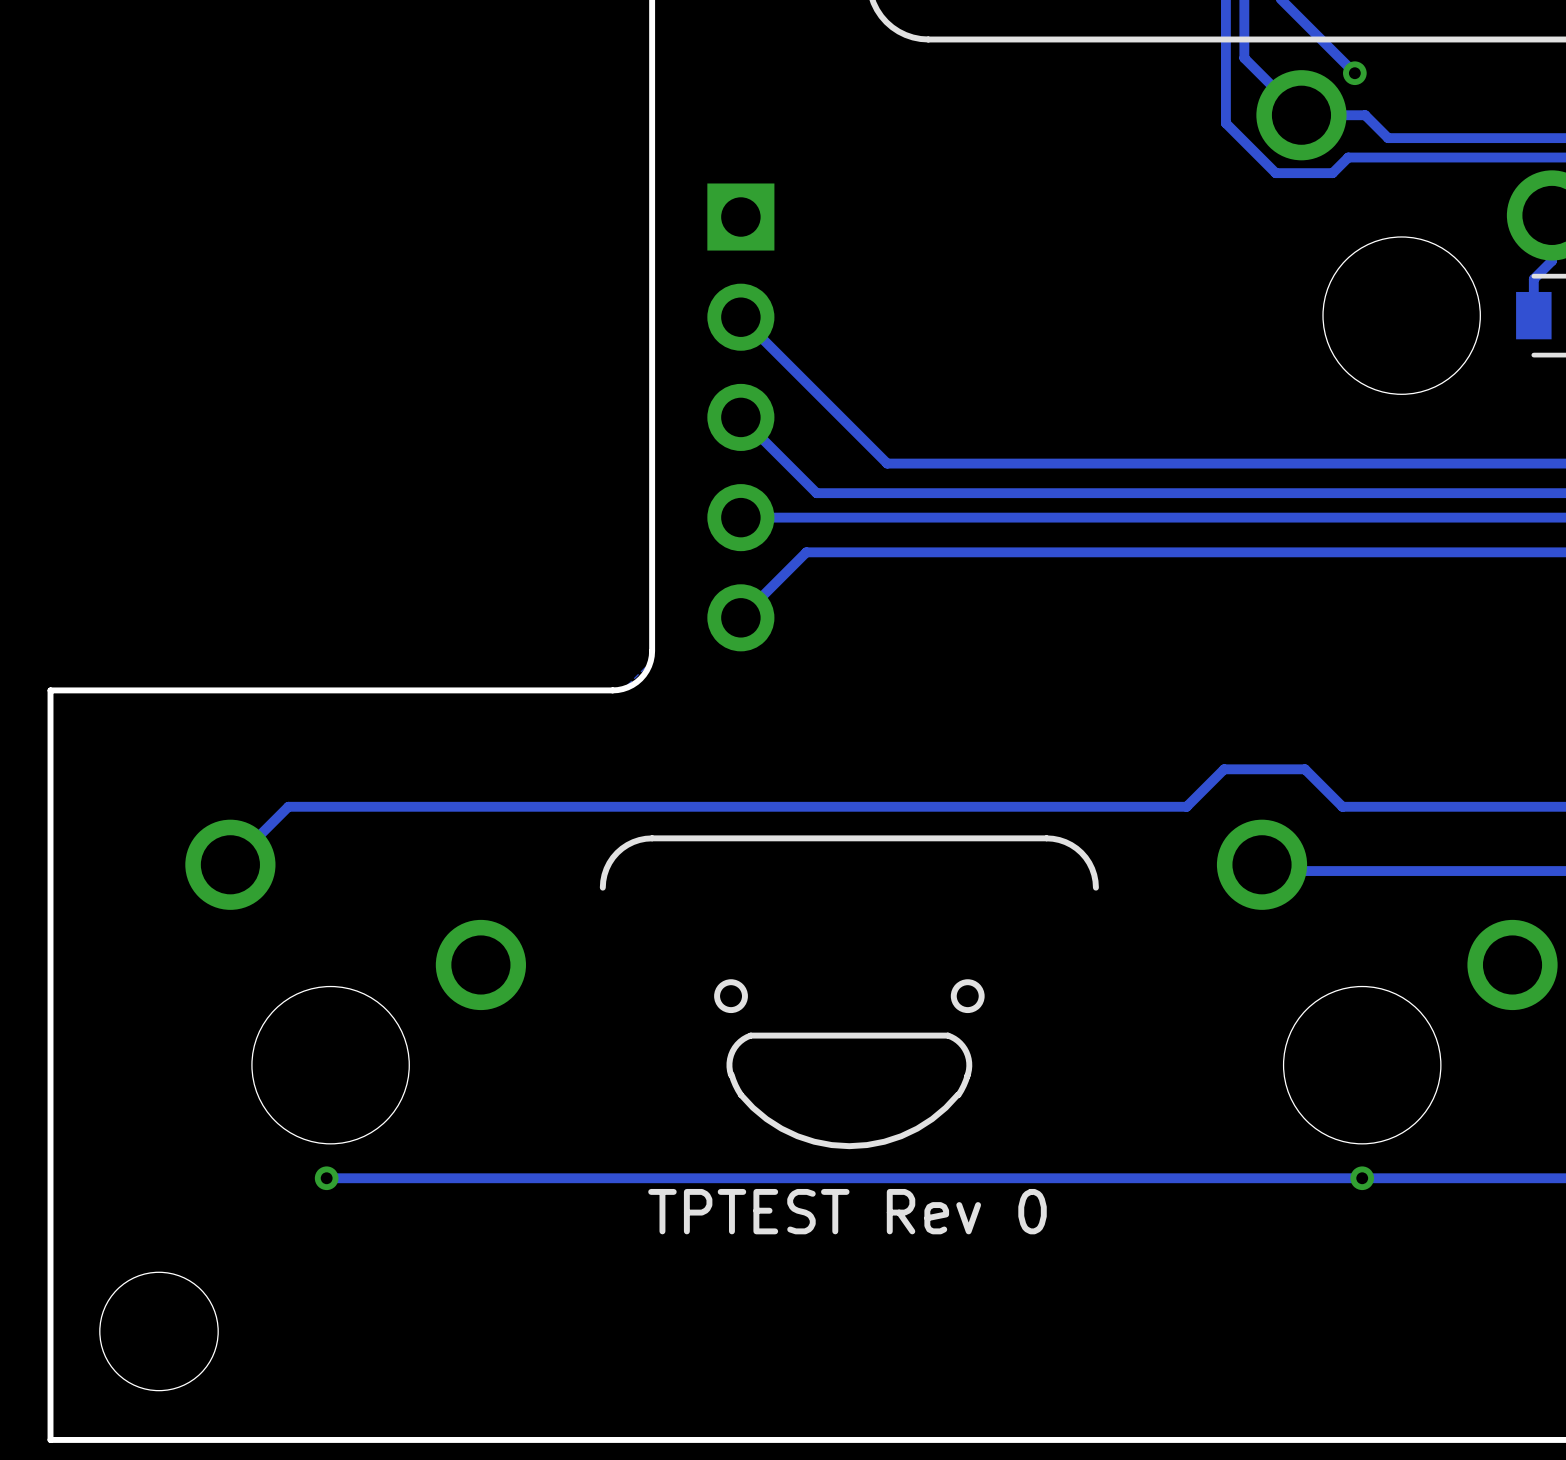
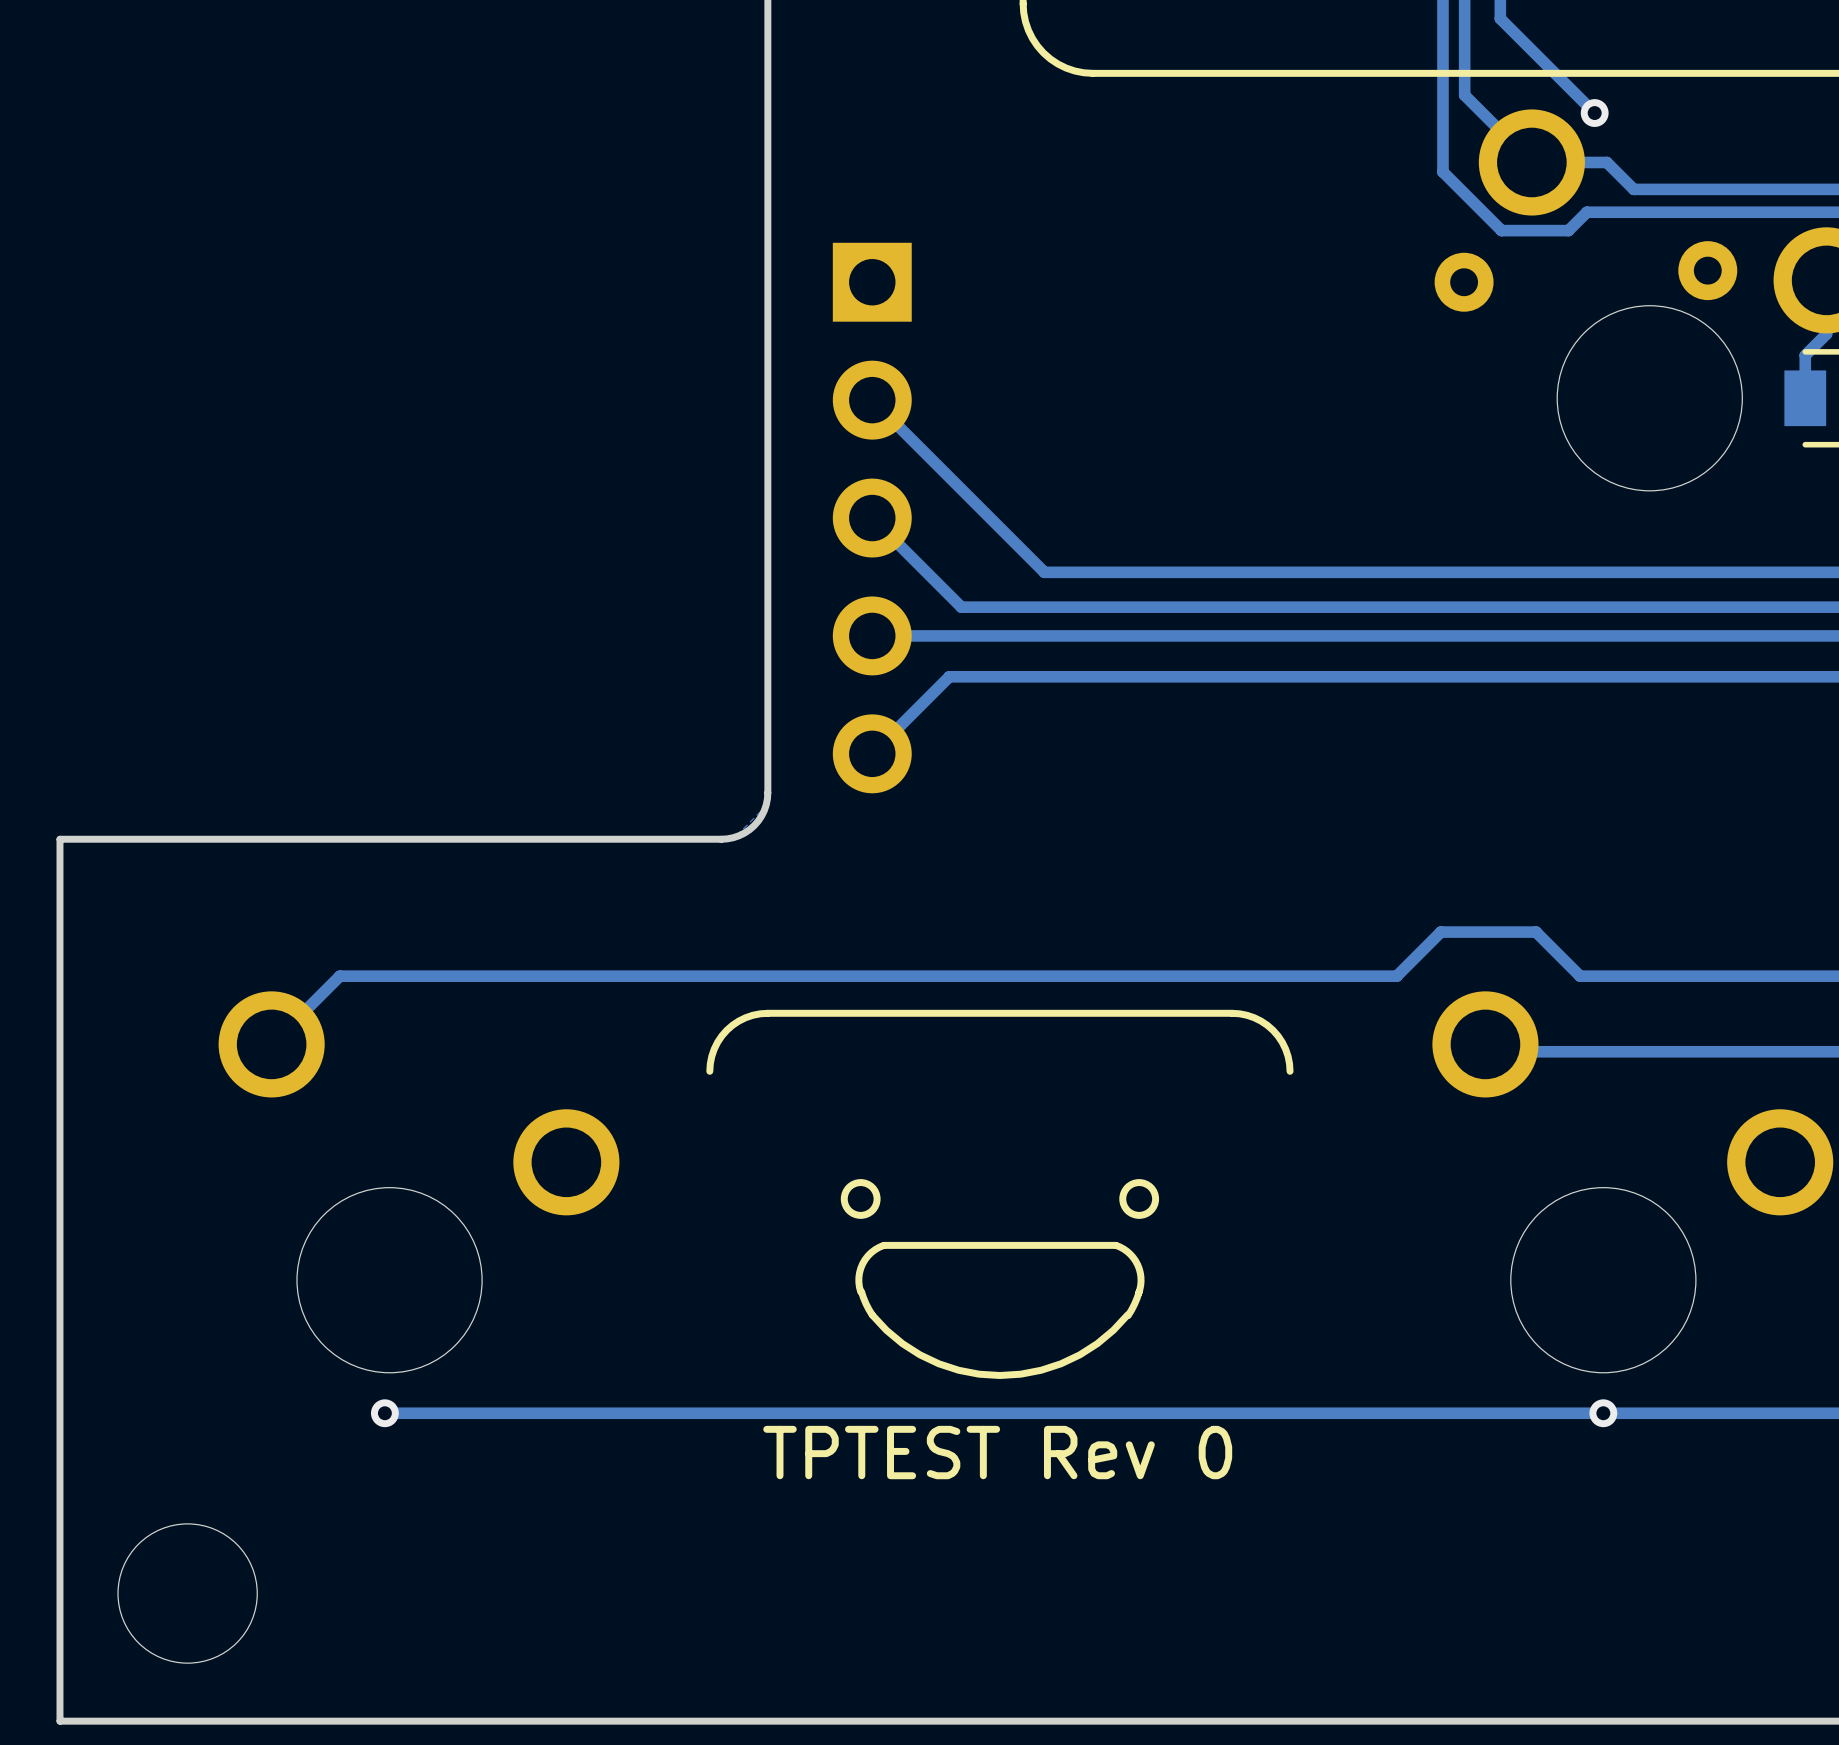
part: none -> (1707, 270)
part: none -> (1464, 282)

